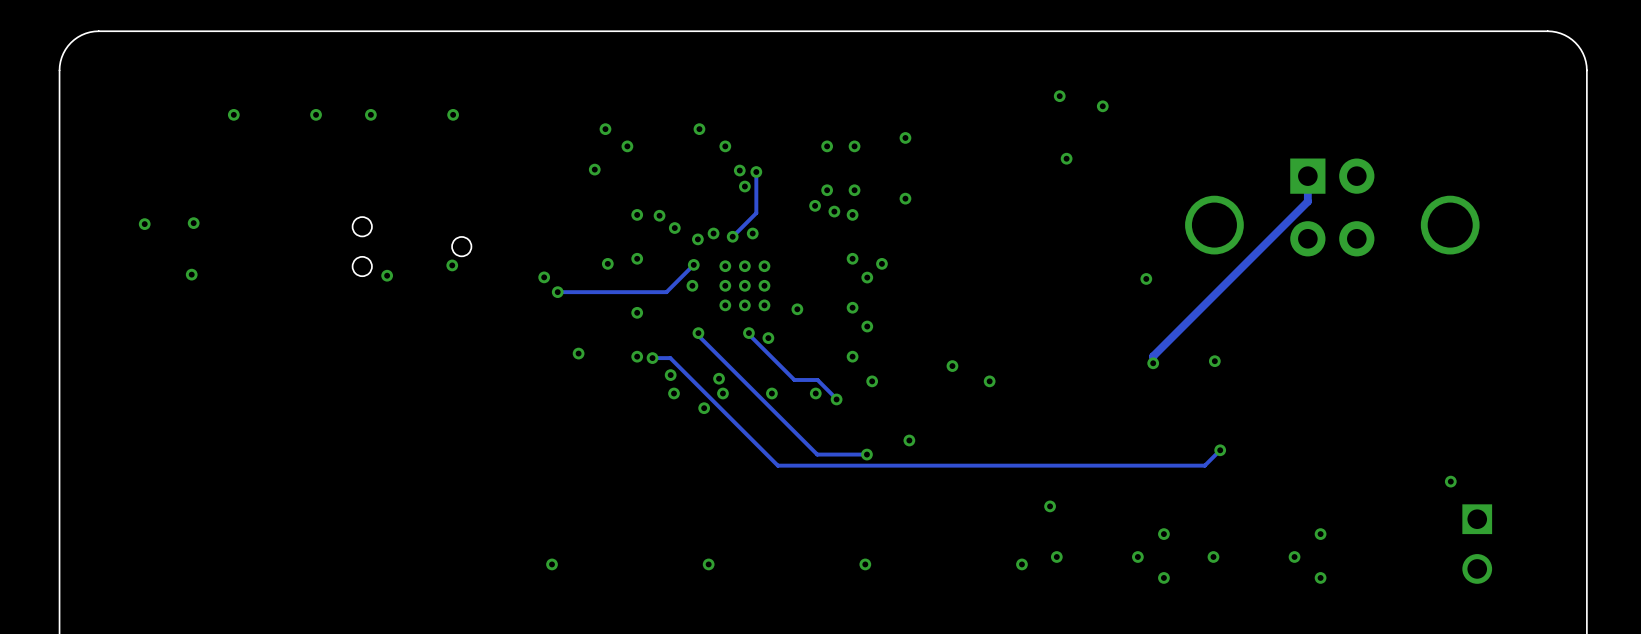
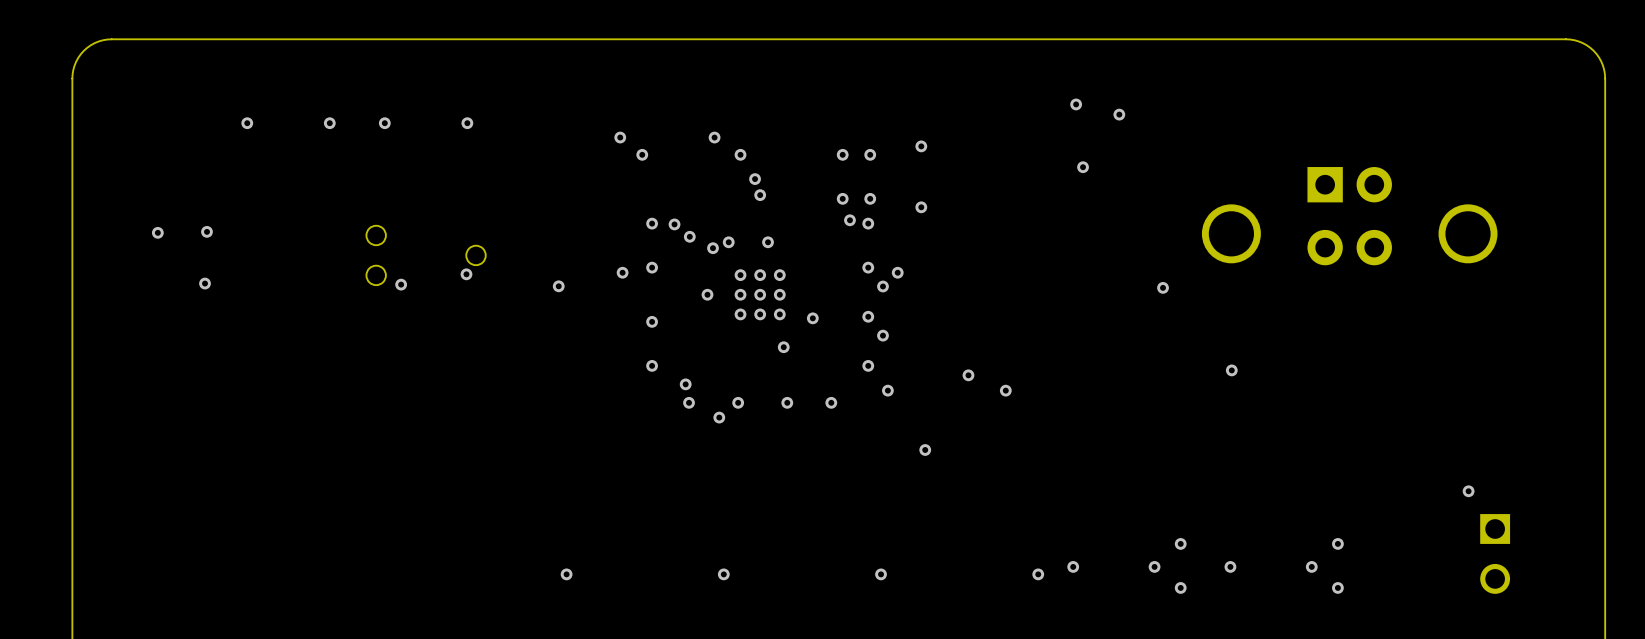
via: (594, 169) -> none
track: (756, 172) (756, 213) (732, 236) -> none
via: (756, 172) -> none
track: (1307, 176) (1307, 201) (1153, 356) (1153, 363) -> none
via: (815, 205) -> none
via: (732, 236) -> none
track: (693, 264) (666, 292) (557, 292) -> none
via: (693, 264) -> none
via: (557, 292) -> none
track: (698, 333) (698, 335) (817, 454) (866, 454) -> none
via: (698, 333) -> none
track: (748, 333) (794, 379) (817, 379) (836, 399) -> none
via: (748, 333) -> none
via: (578, 353) -> none
track: (652, 358) (670, 358) (777, 465) (1204, 465) (1220, 450) -> none
via: (652, 358) -> none
via: (1153, 363) -> none
via: (719, 378) -> none
via: (836, 399) -> none
via: (1220, 450) -> none
via: (866, 454) -> none
via: (1050, 506) -> none

